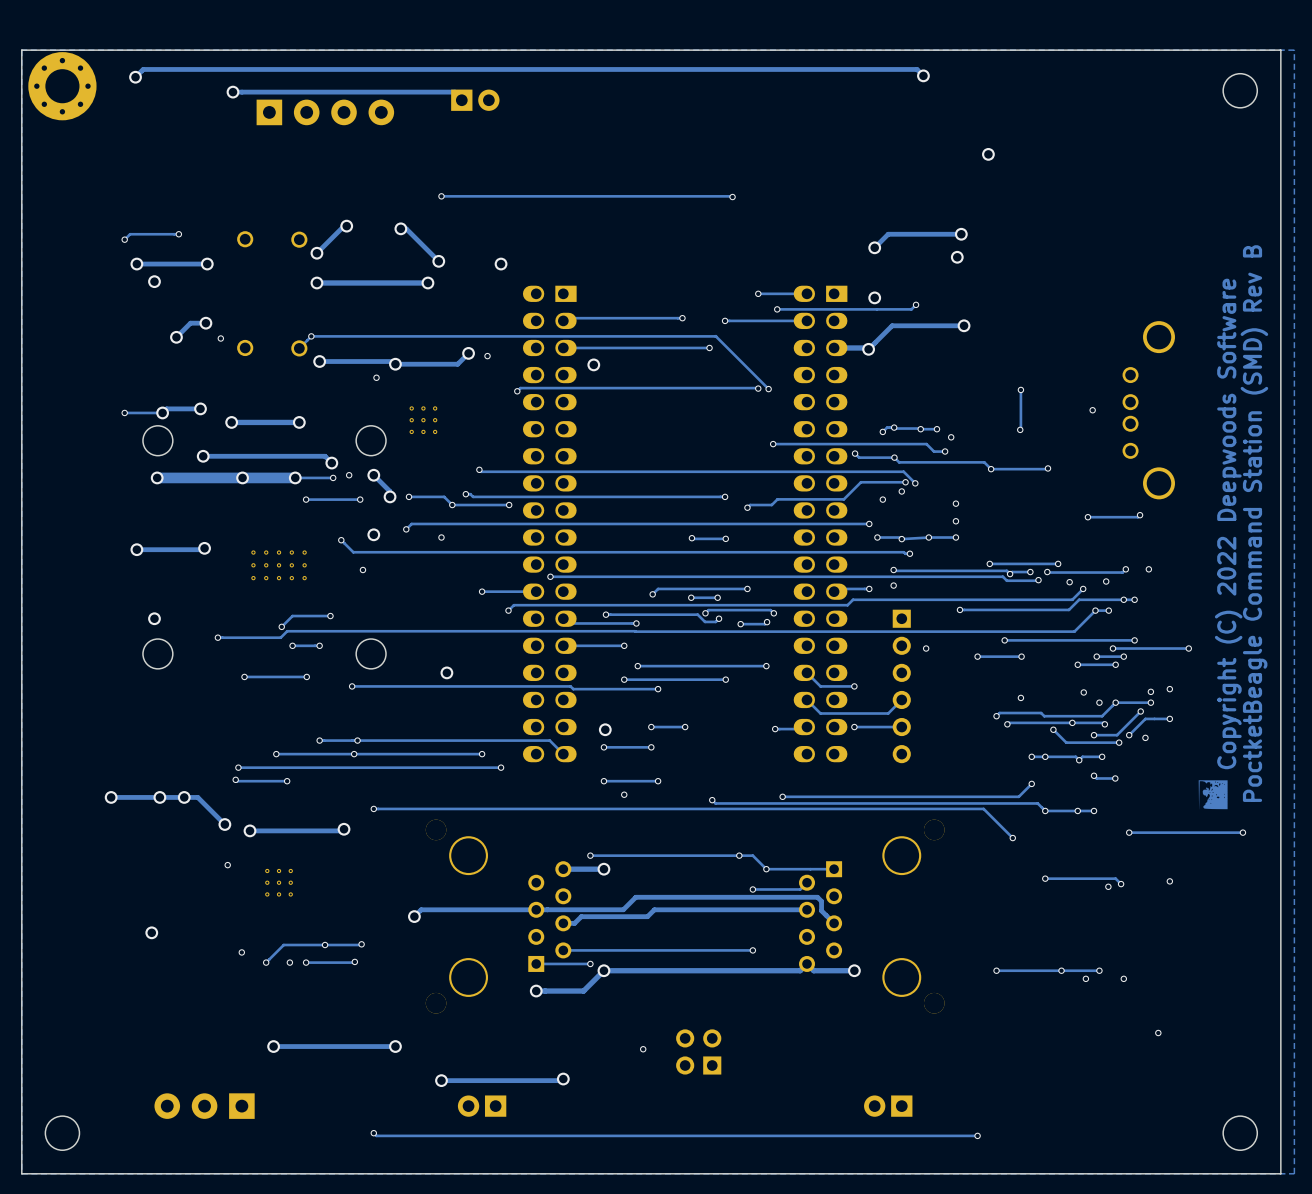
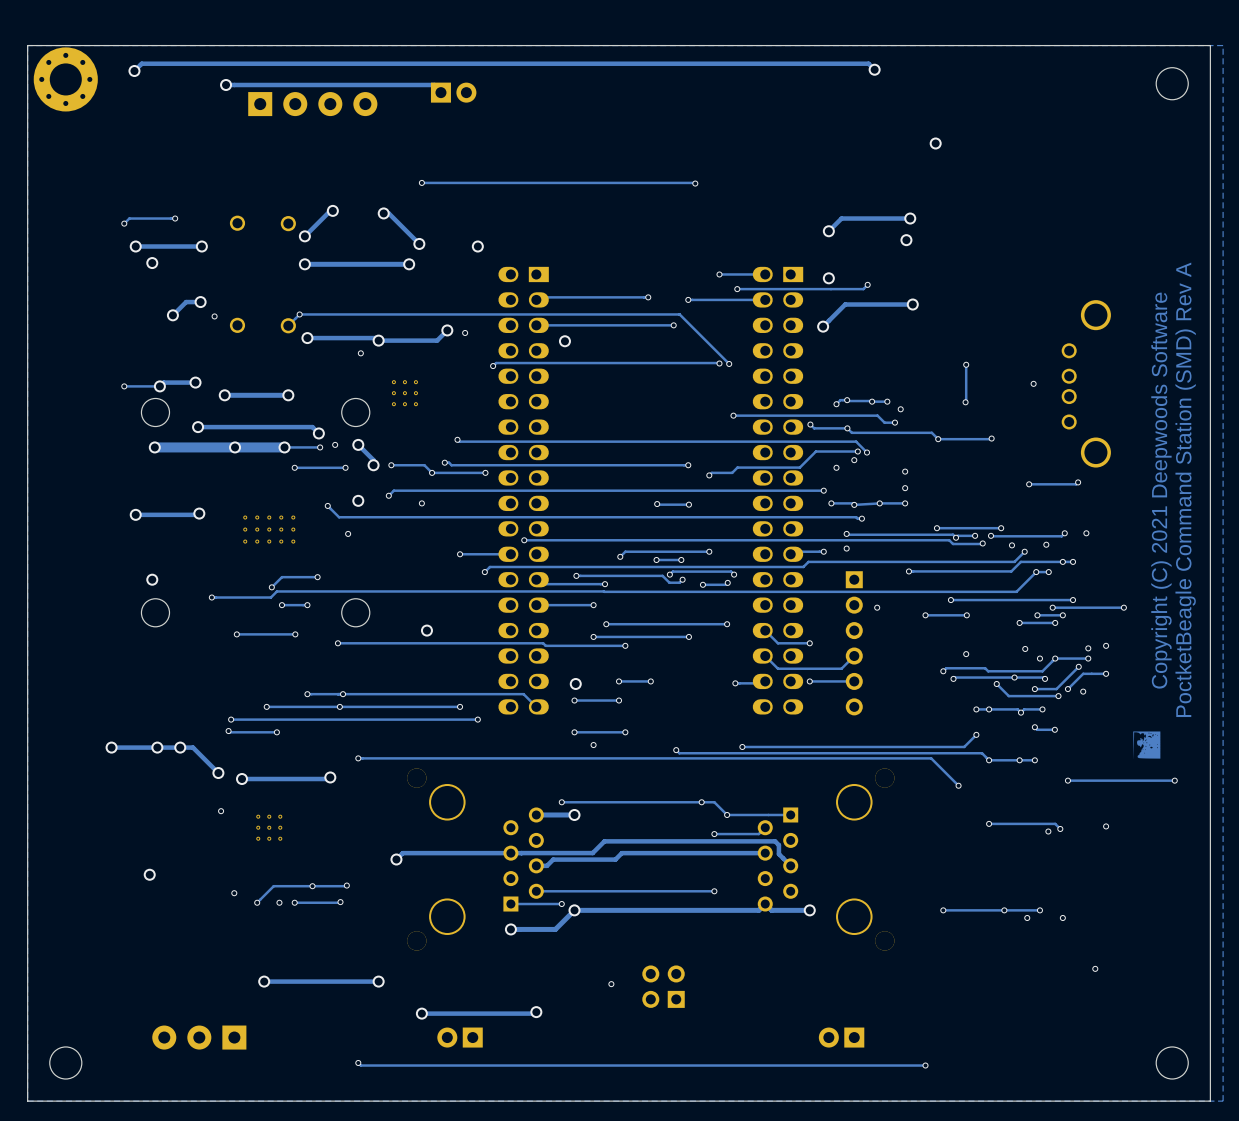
track: (834, 347) (868, 349) -> none
text: Copyright (C) 2022 Deepwoods Software (1228, 523) -> Copyright (C) 2021 Deepwoods Software (1161, 490)
text: PoctketBeagle Command Station (SMD) Rev B (1254, 523) -> PoctketBeagle Command Station (SMD) Rev A (1185, 489)

